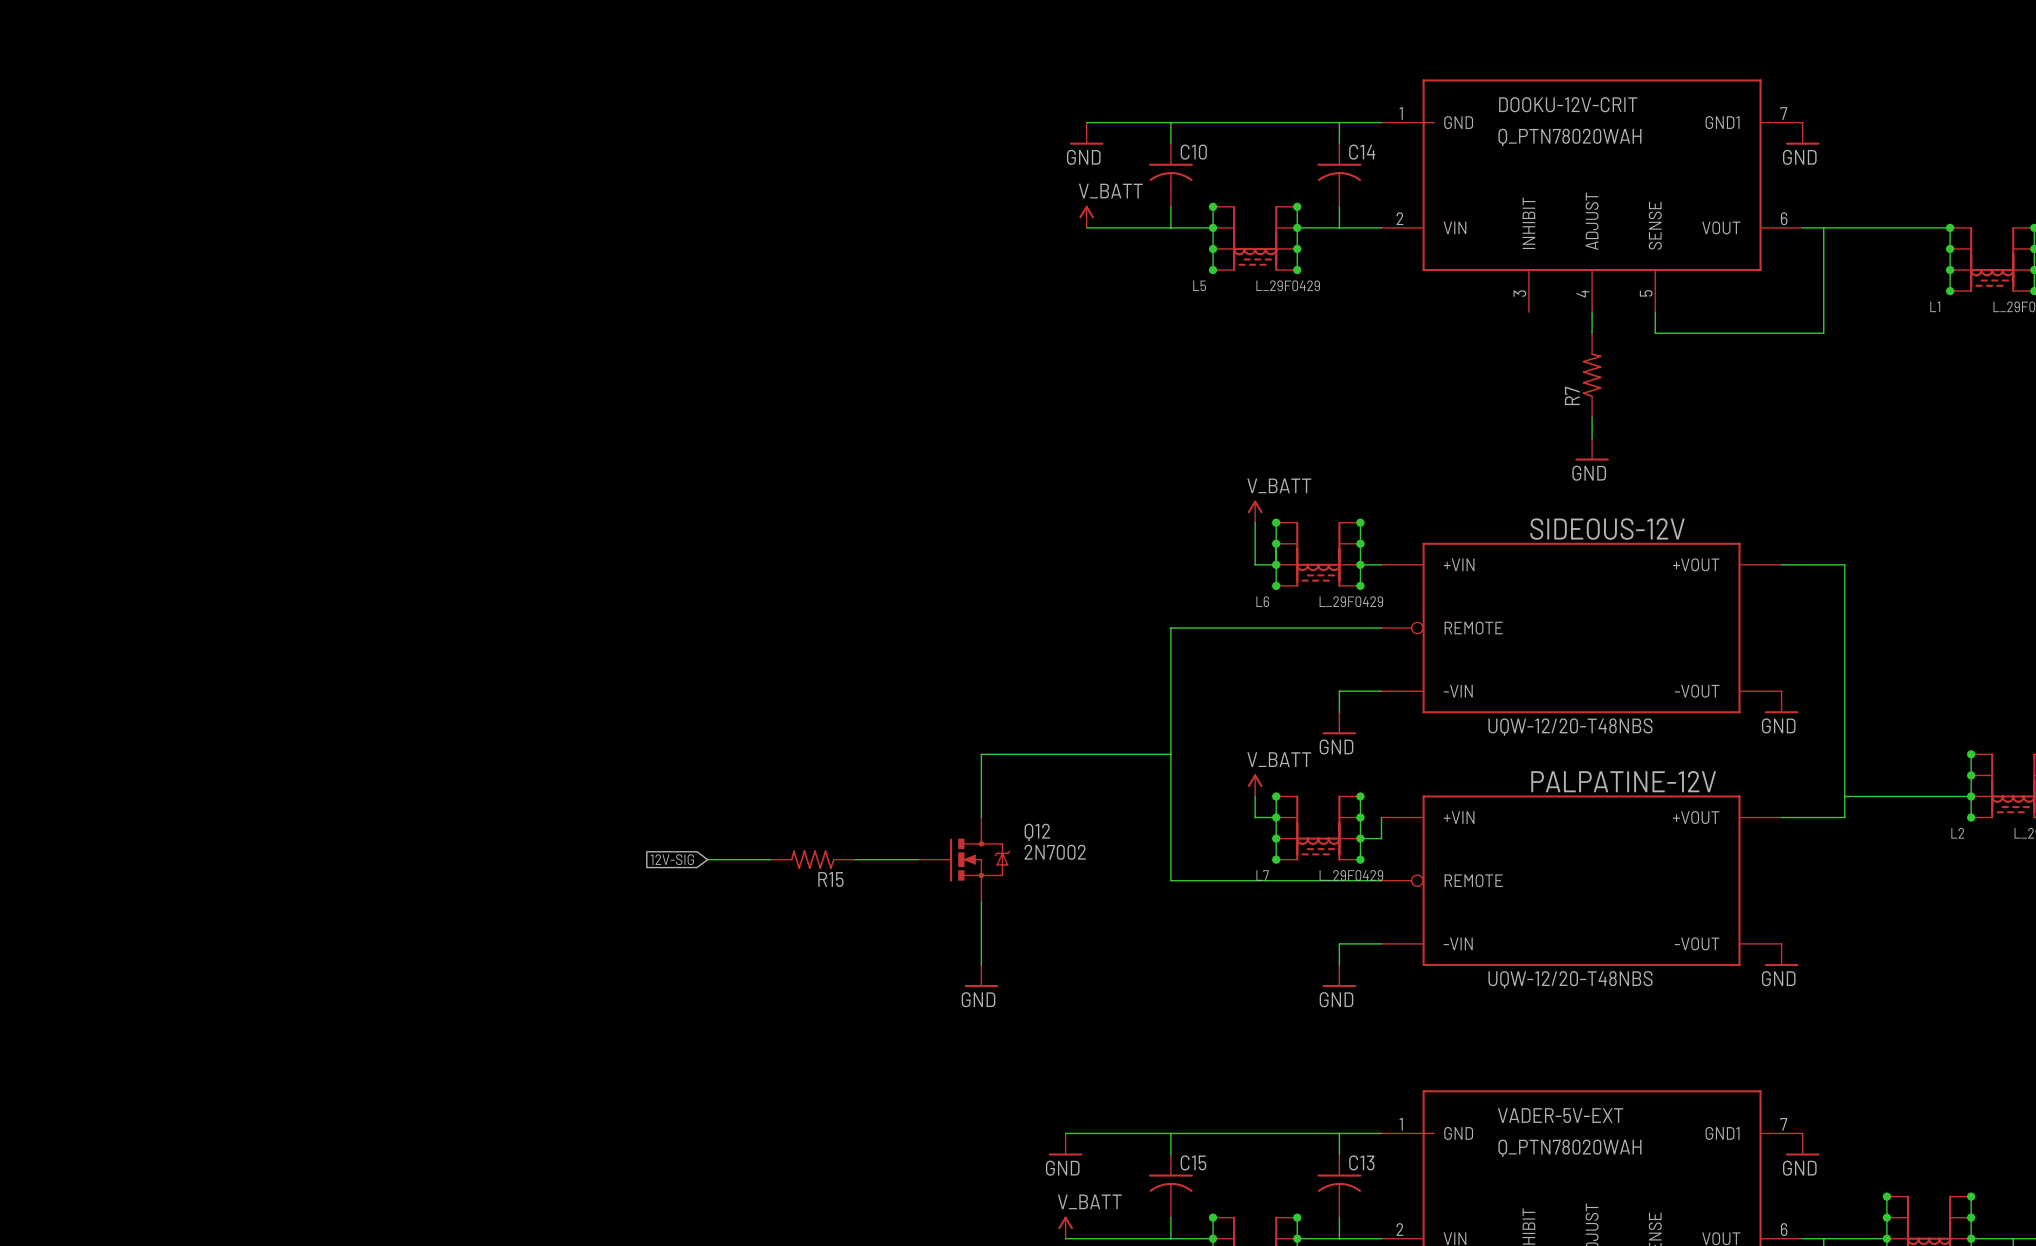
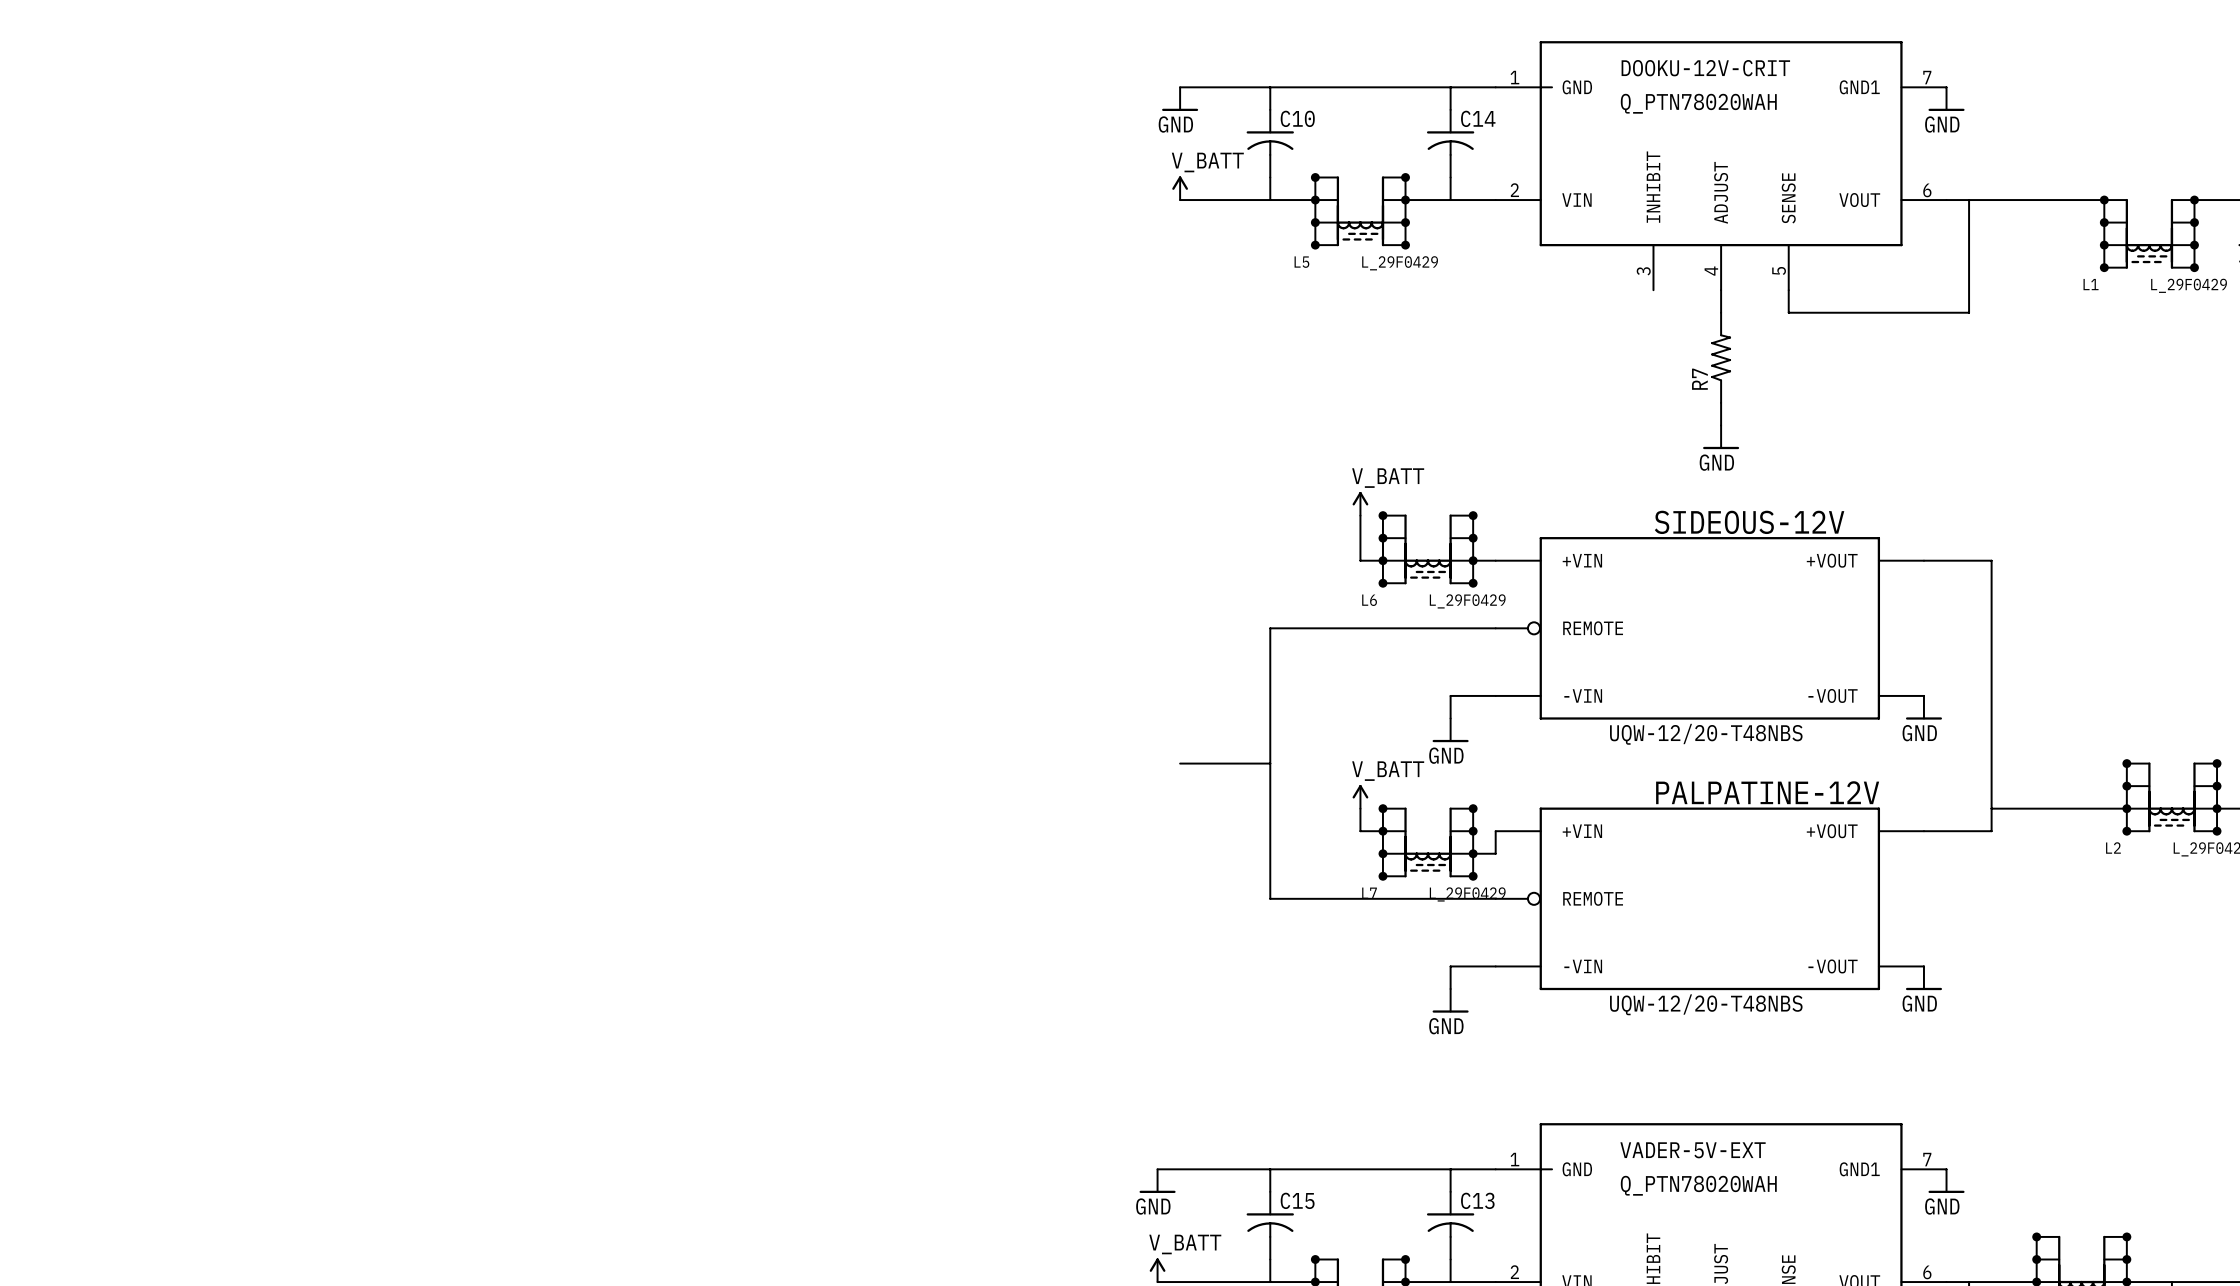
wire: (1086, 754) (981, 754) (981, 817) -> none
global label: 12V-SIG (672, 859) -> none
wire: (707, 859) (770, 859) -> none
R15: (812, 859) -> none
wire: (855, 859) (918, 859) -> none
Q12: 2N7002 (964, 859) -> none
wire: (981, 901) (981, 964) -> none
power symbol: GND (981, 976) -> none

